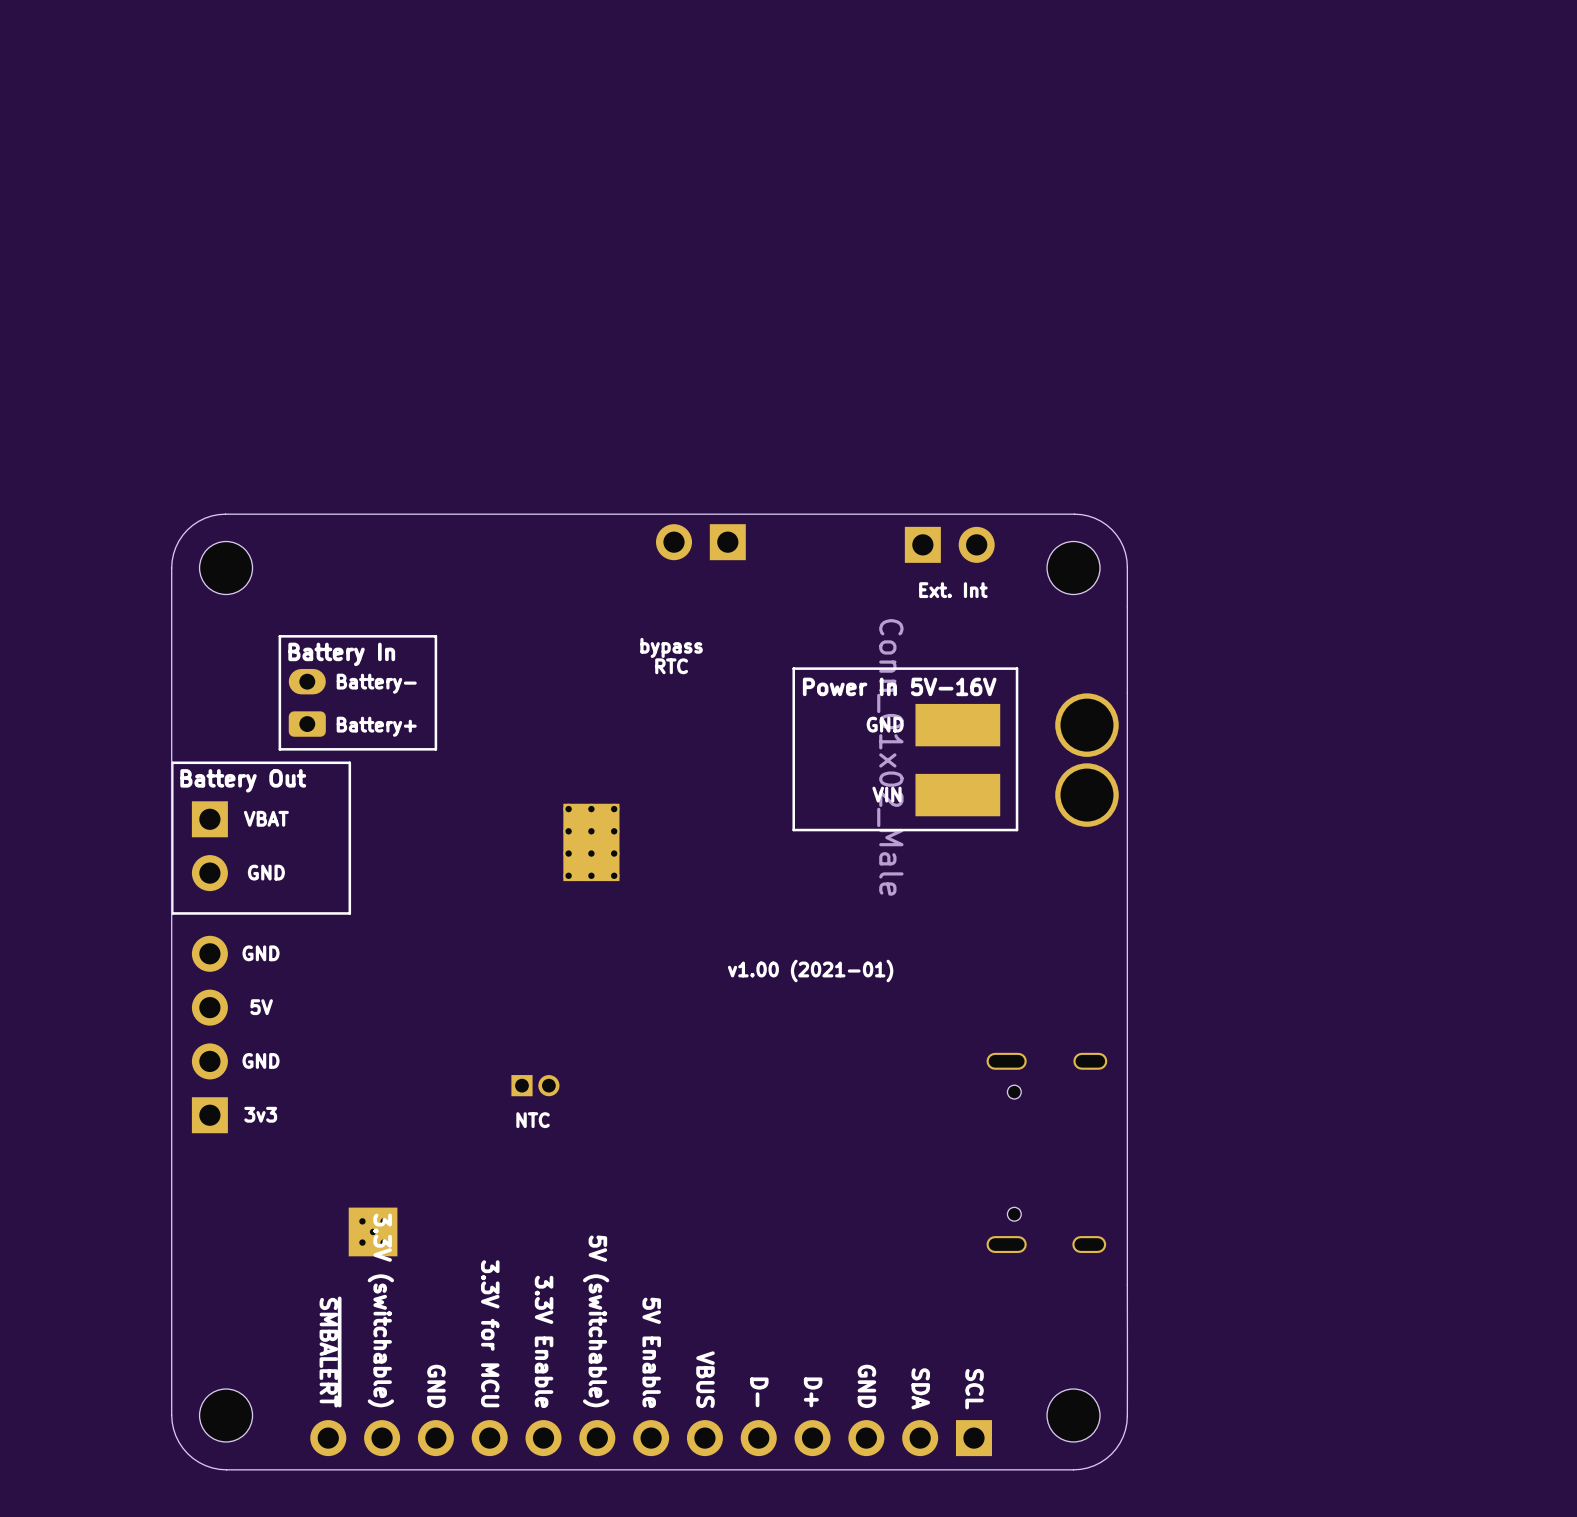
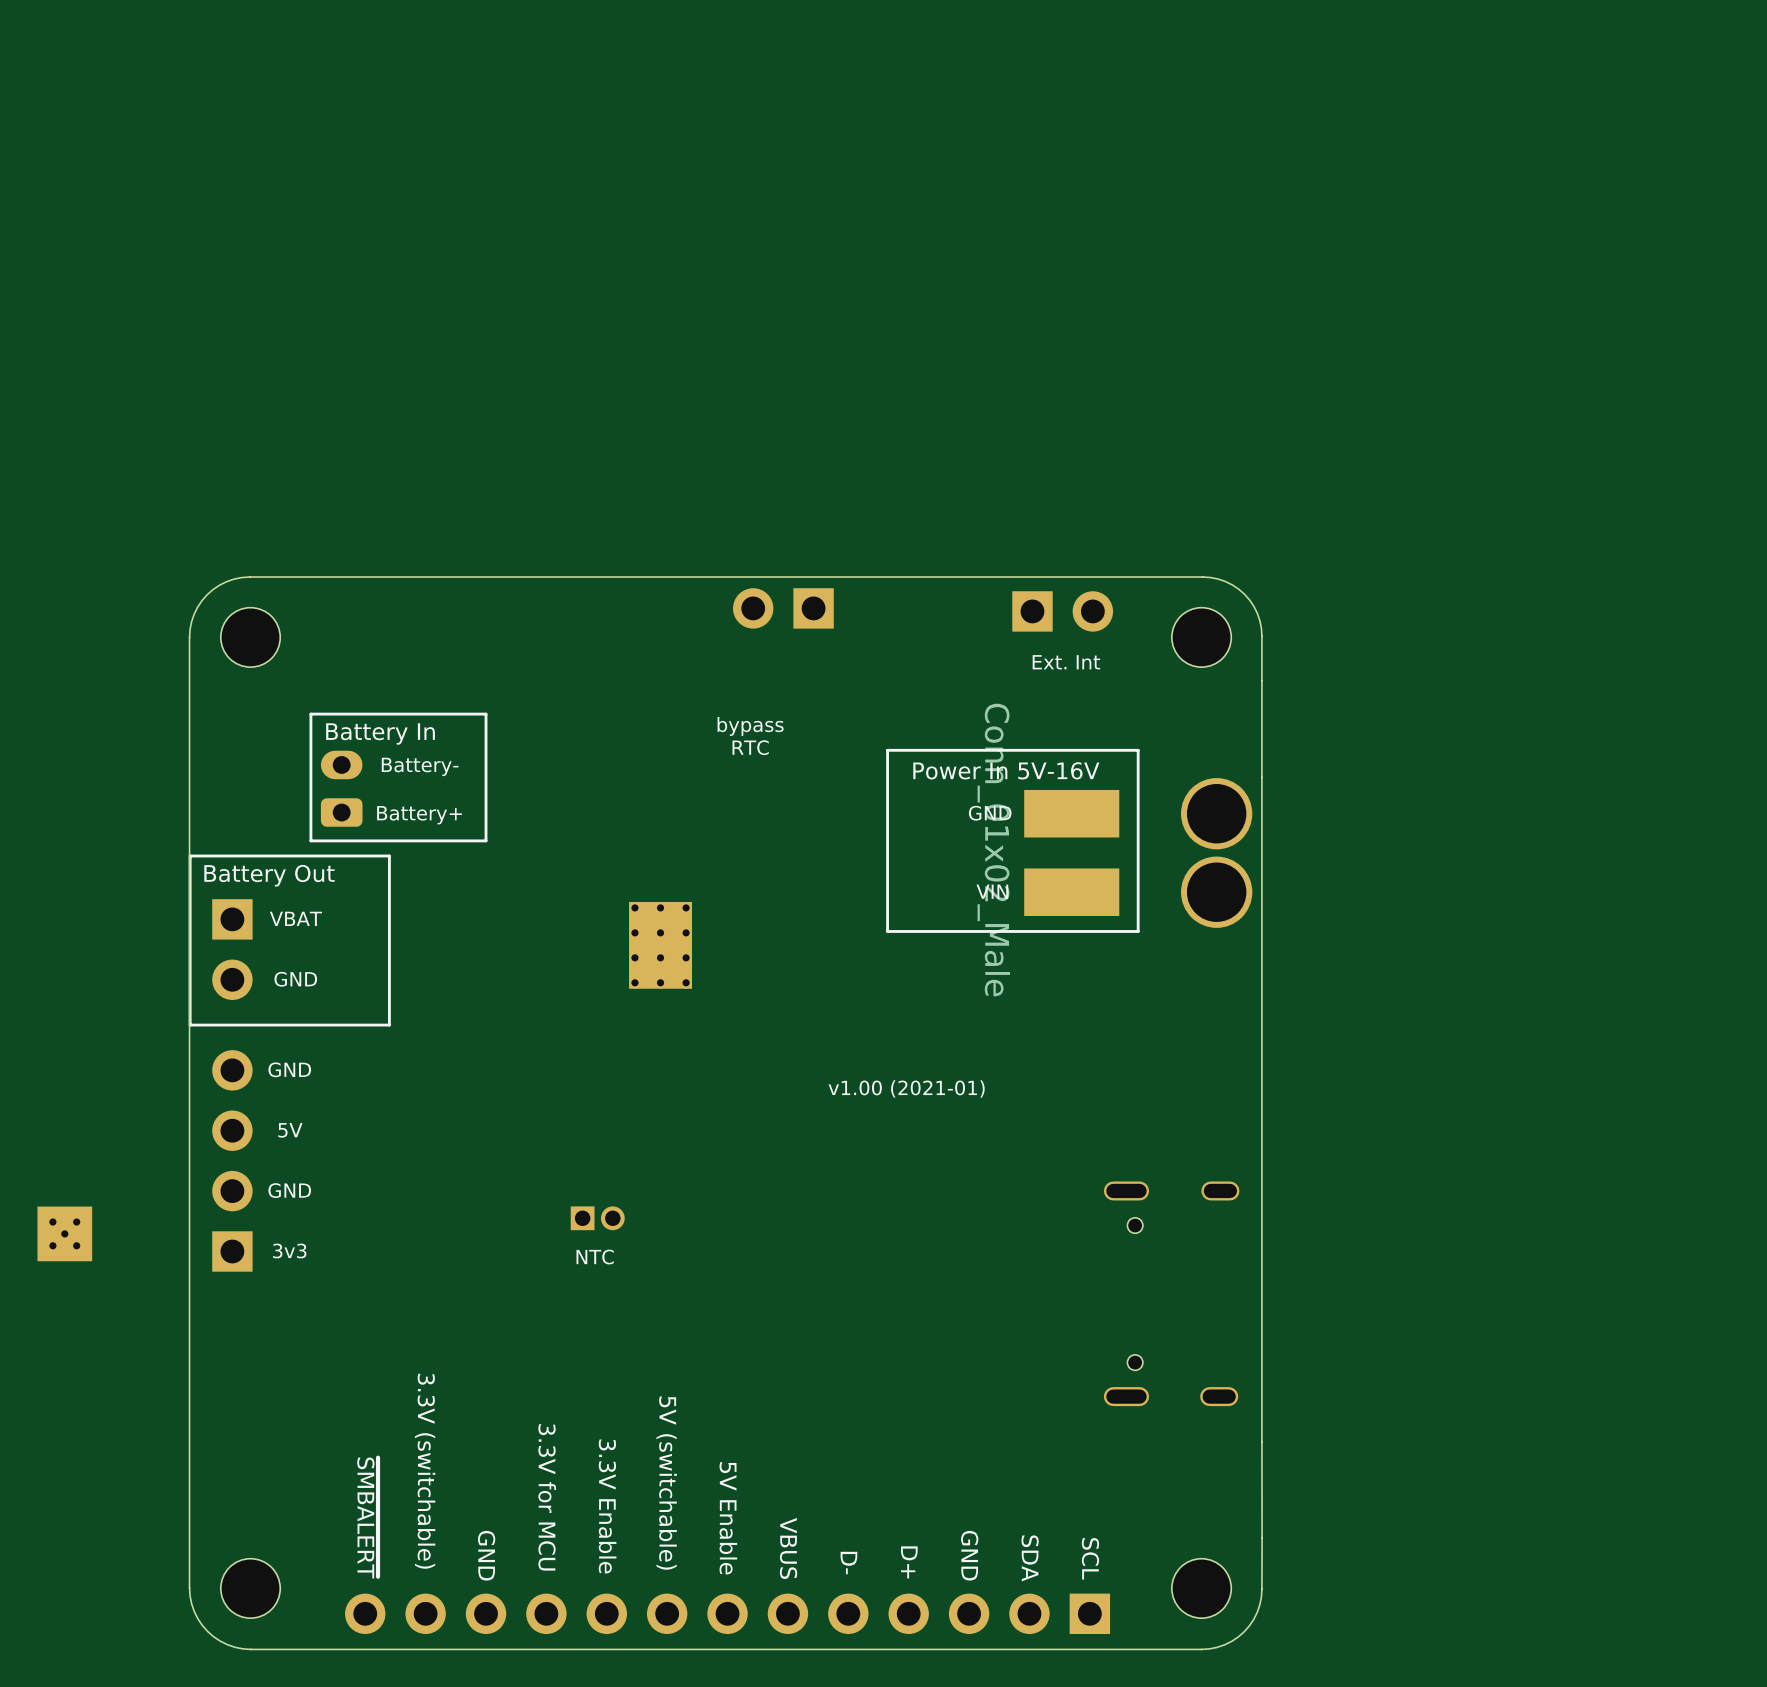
part position: (373, 1231) -> (64, 1233)

